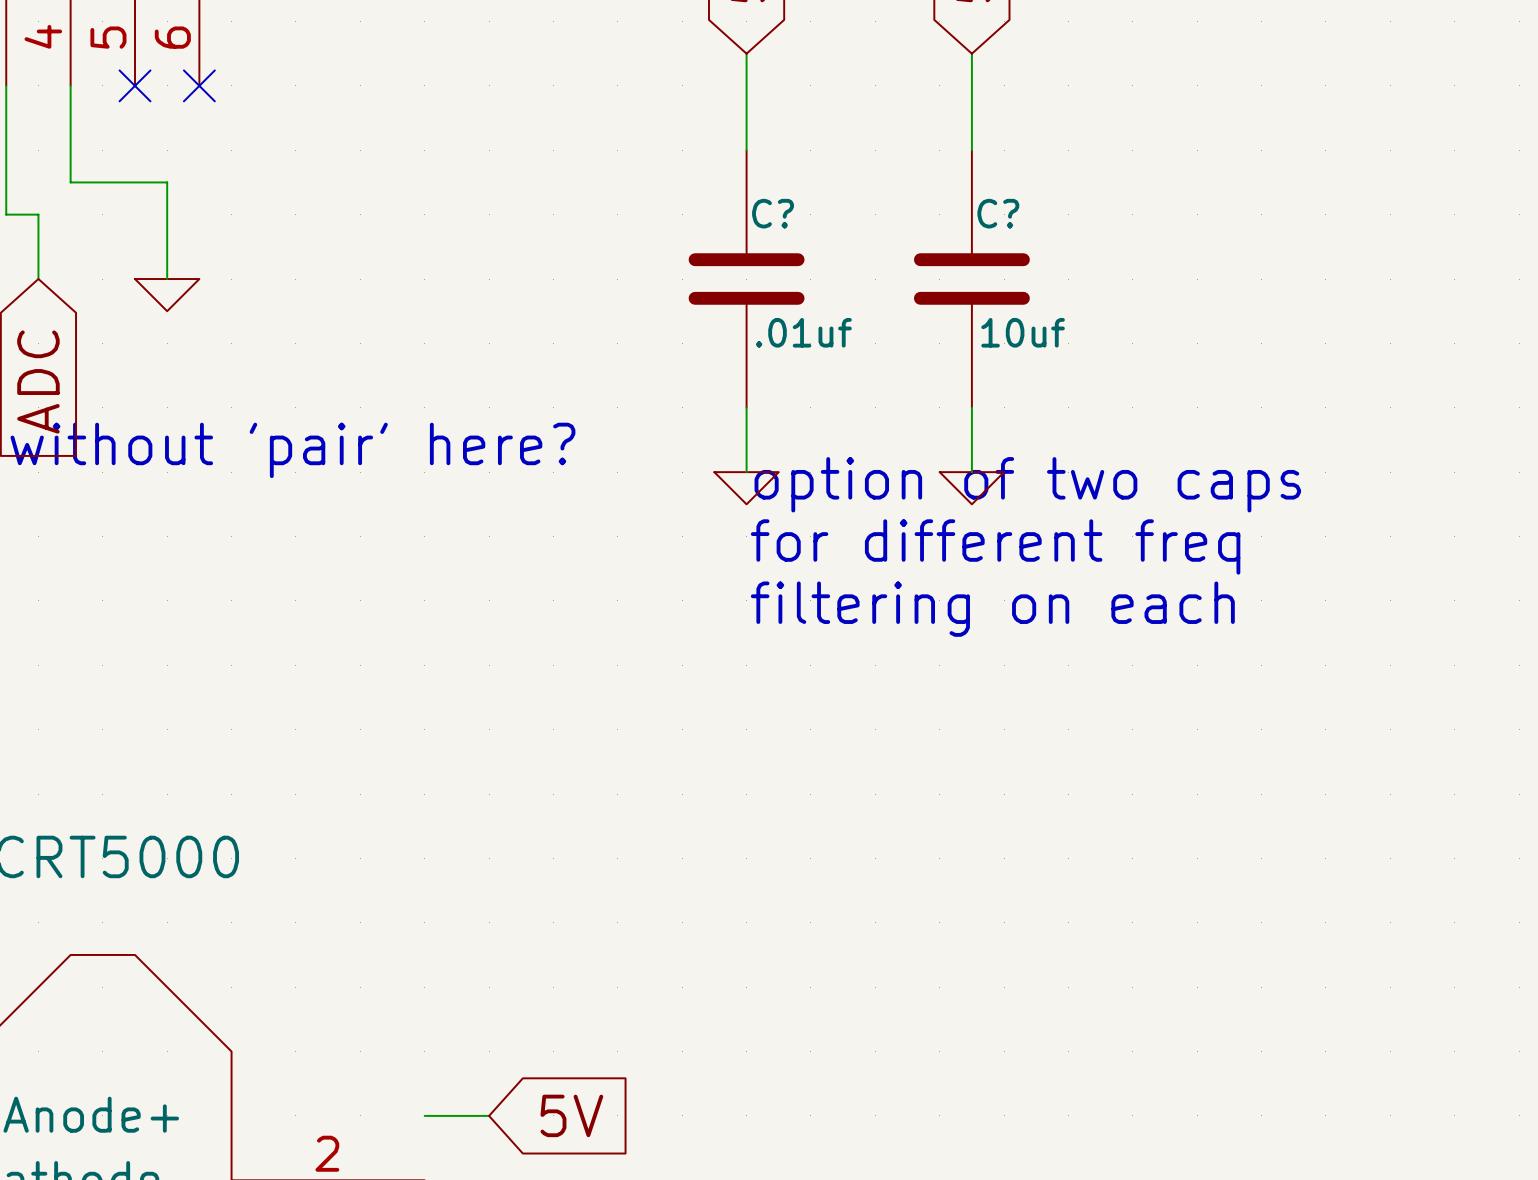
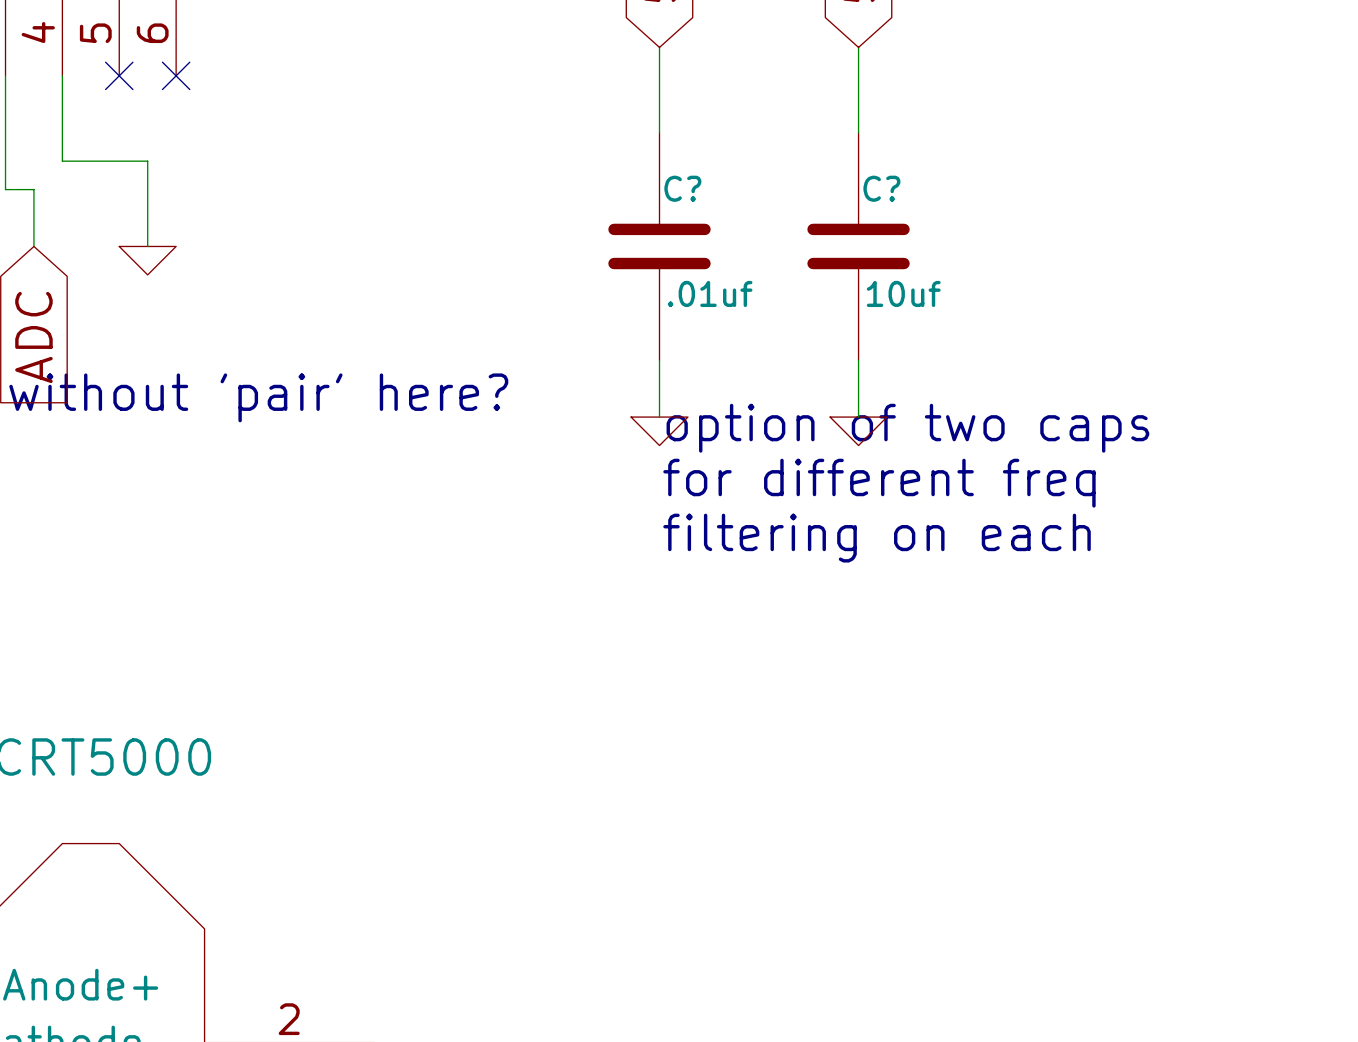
wire: (424, 1115) (489, 1115) -> none
global label: 5V (571, 1115) -> none

